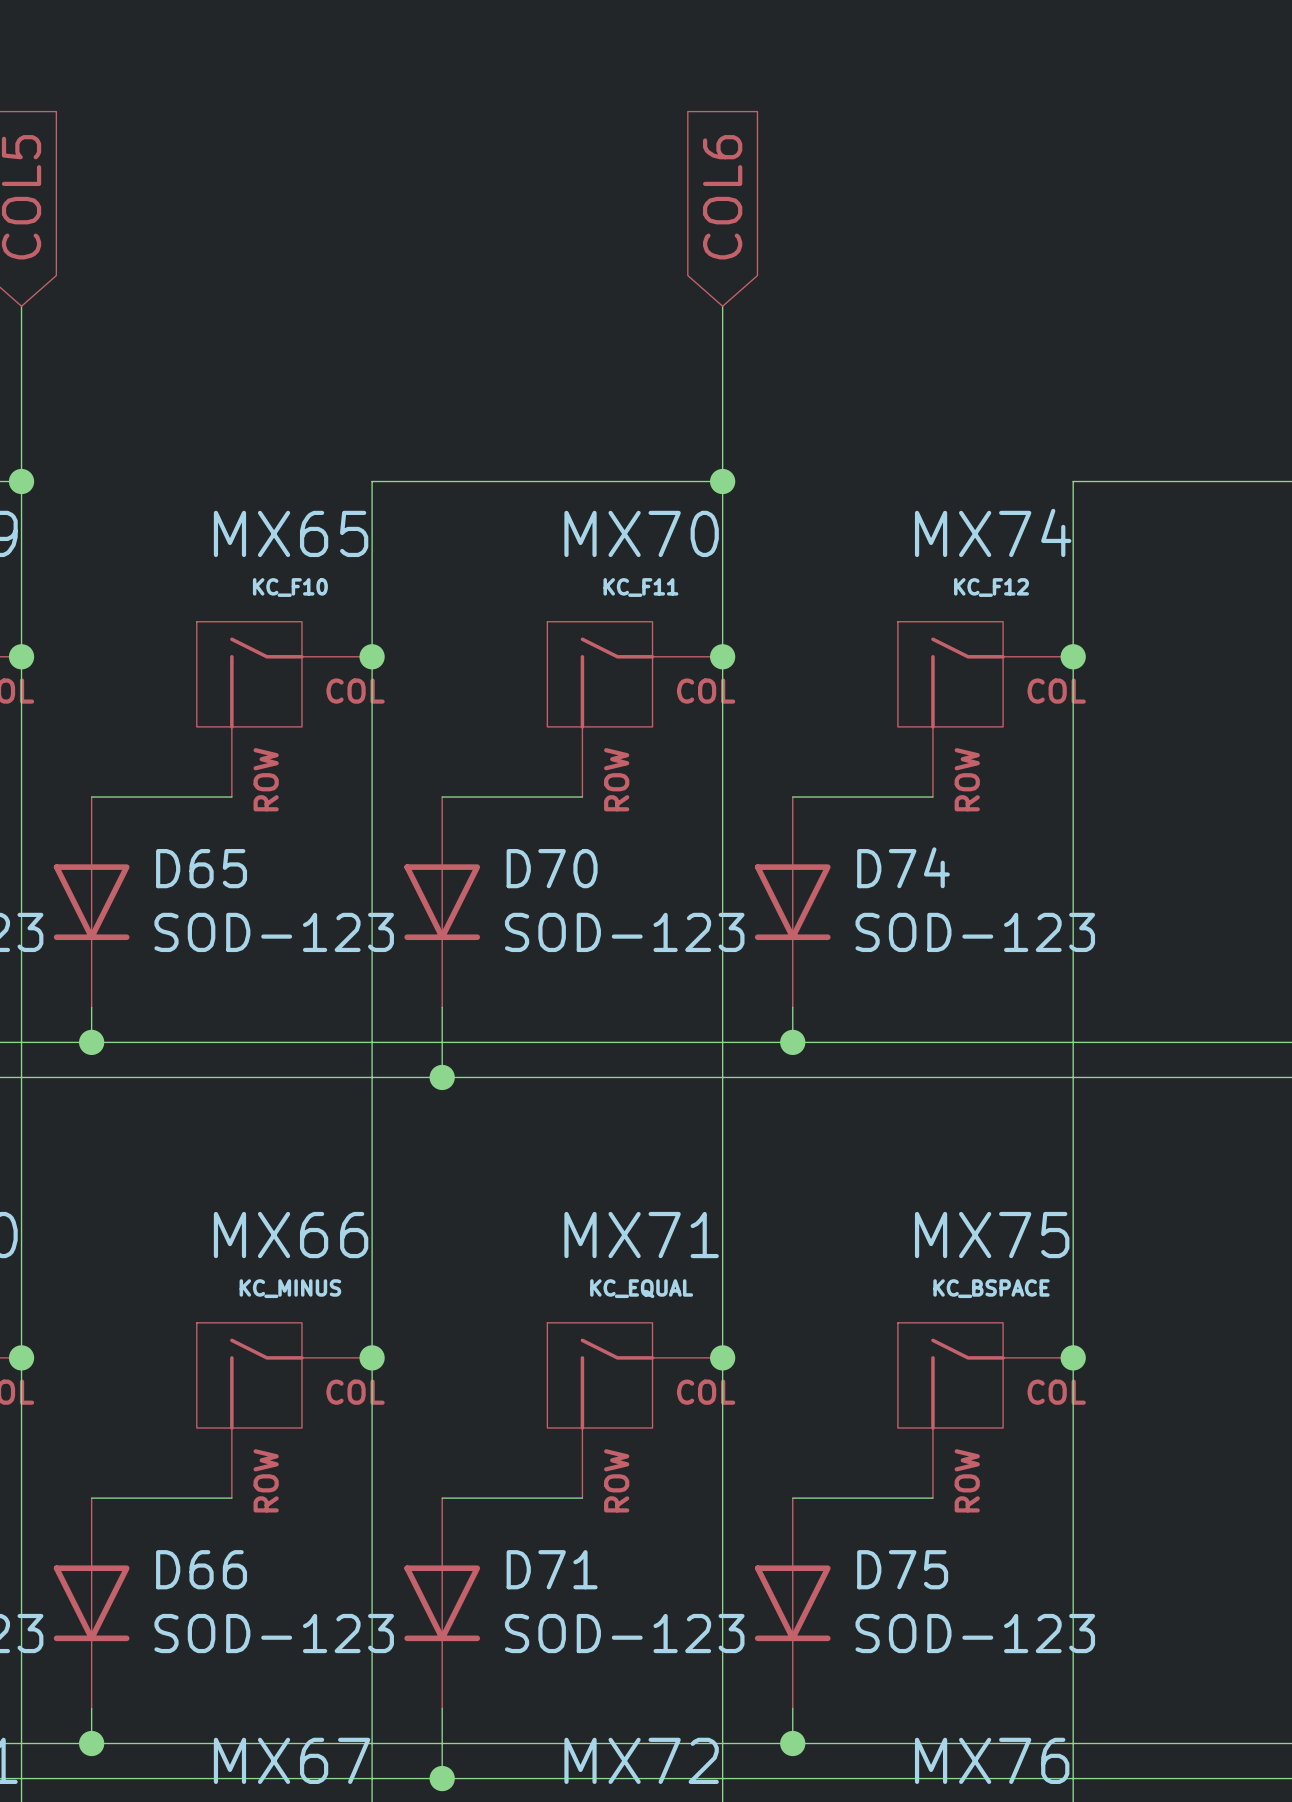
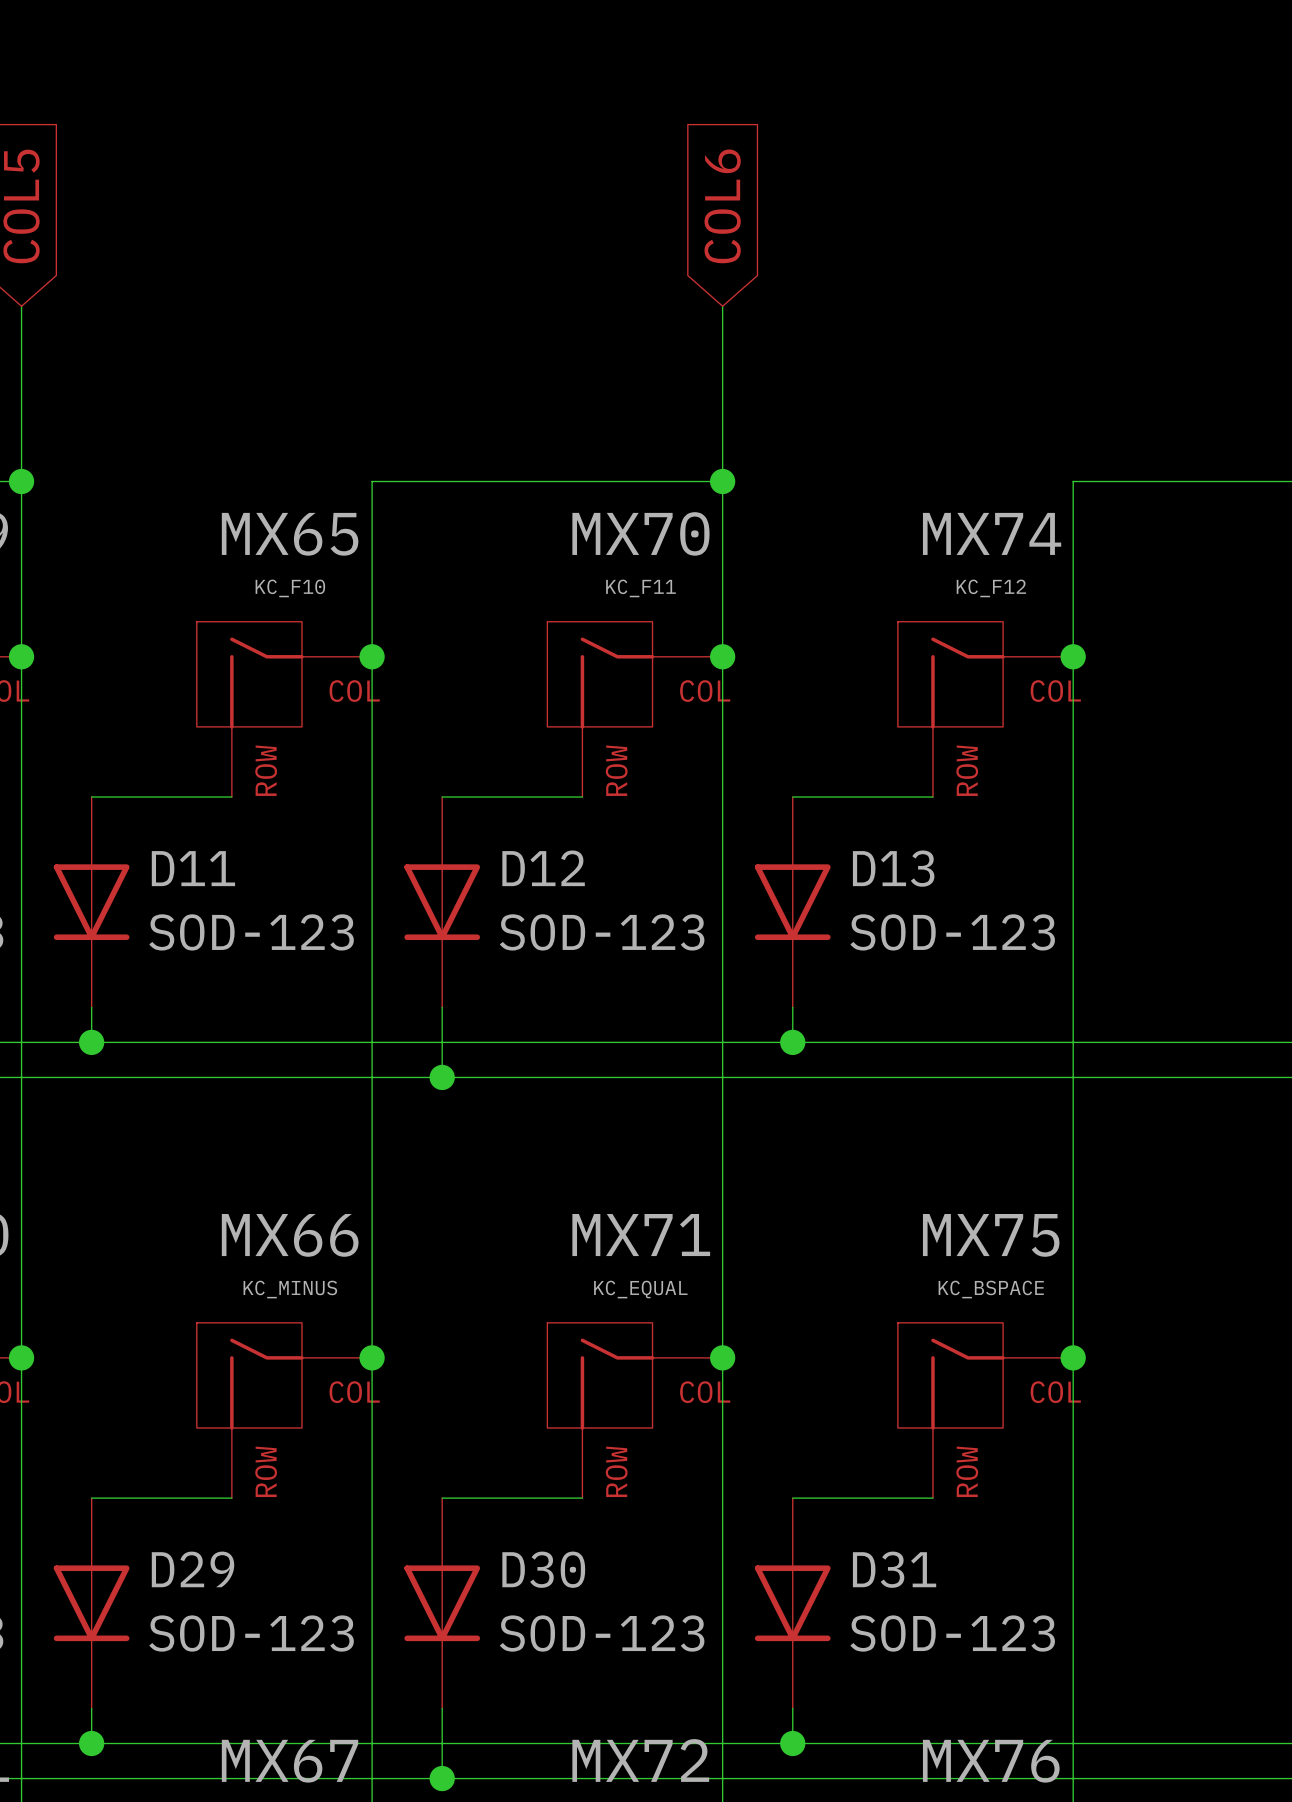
D74 name: D74 (903, 867) -> D13 (893, 868)
D65 name: D65 (201, 868) -> D11 (193, 868)
D70 name: D70 (552, 868) -> D12 (543, 868)
D66 name: D66 (201, 1569) -> D29 (193, 1569)
D71 name: D71 (552, 1569) -> D30 (543, 1569)
D75 name: D75 (902, 1569) -> D31 (894, 1569)

